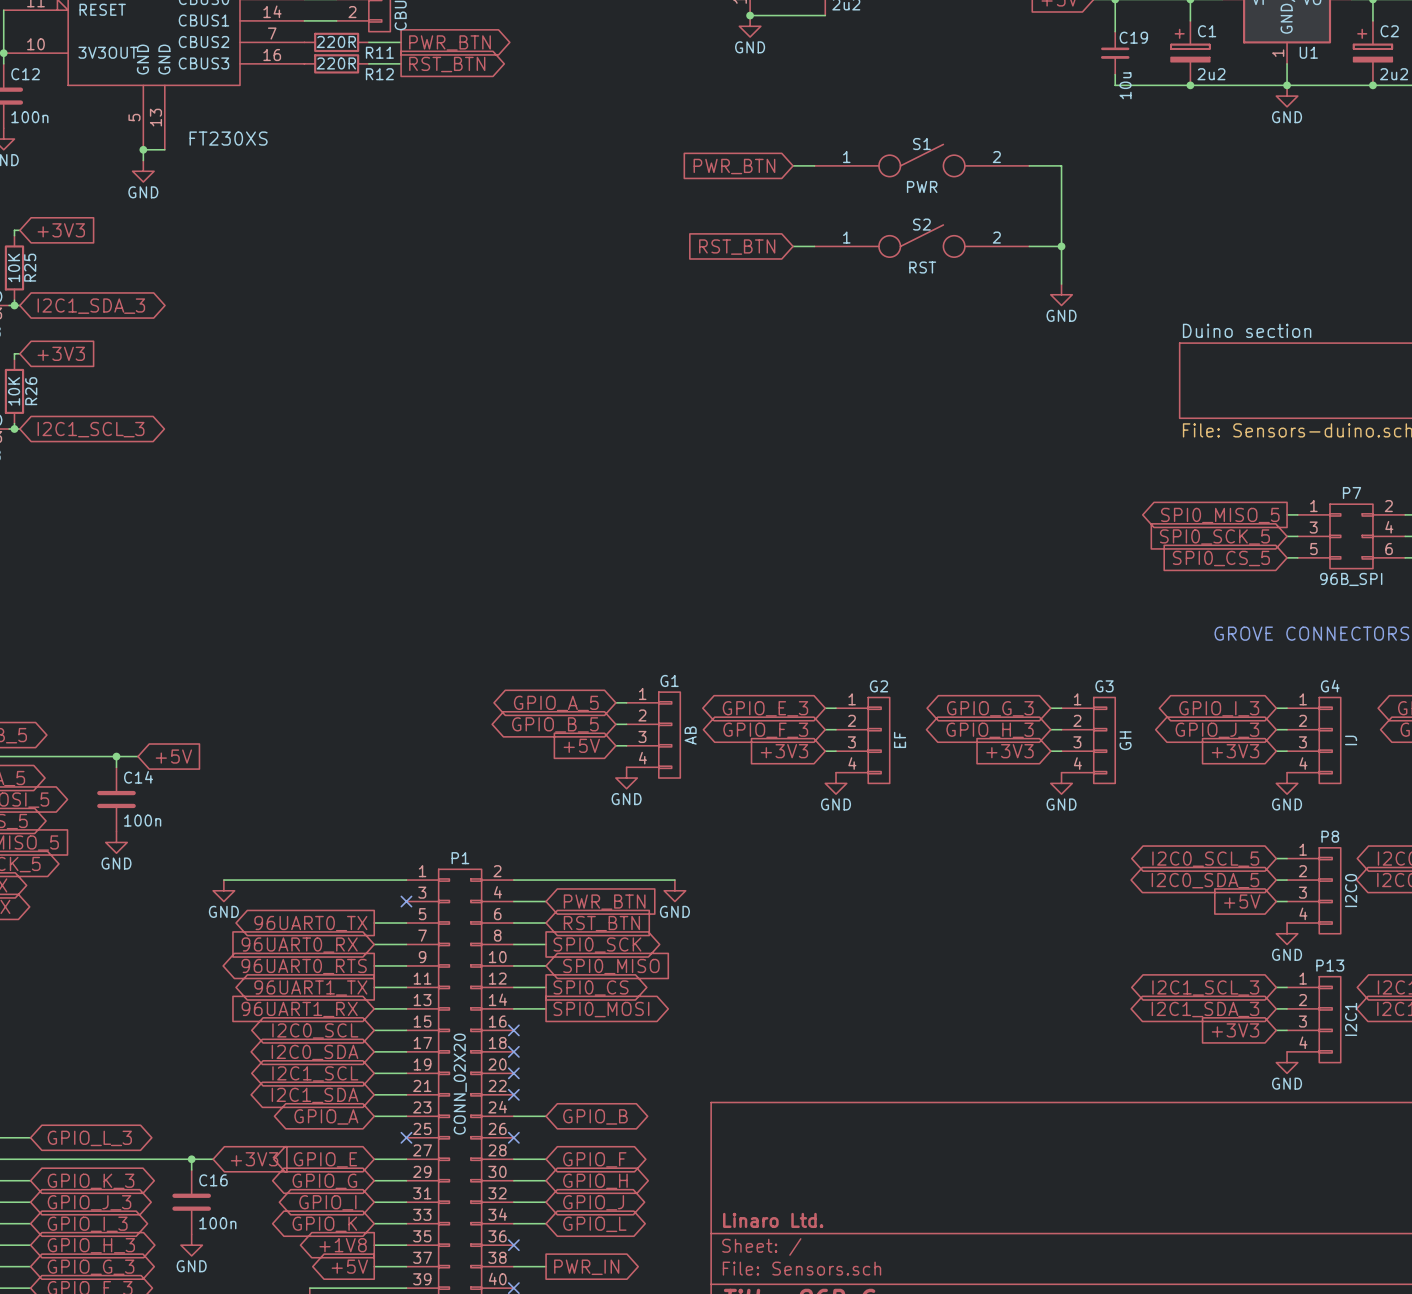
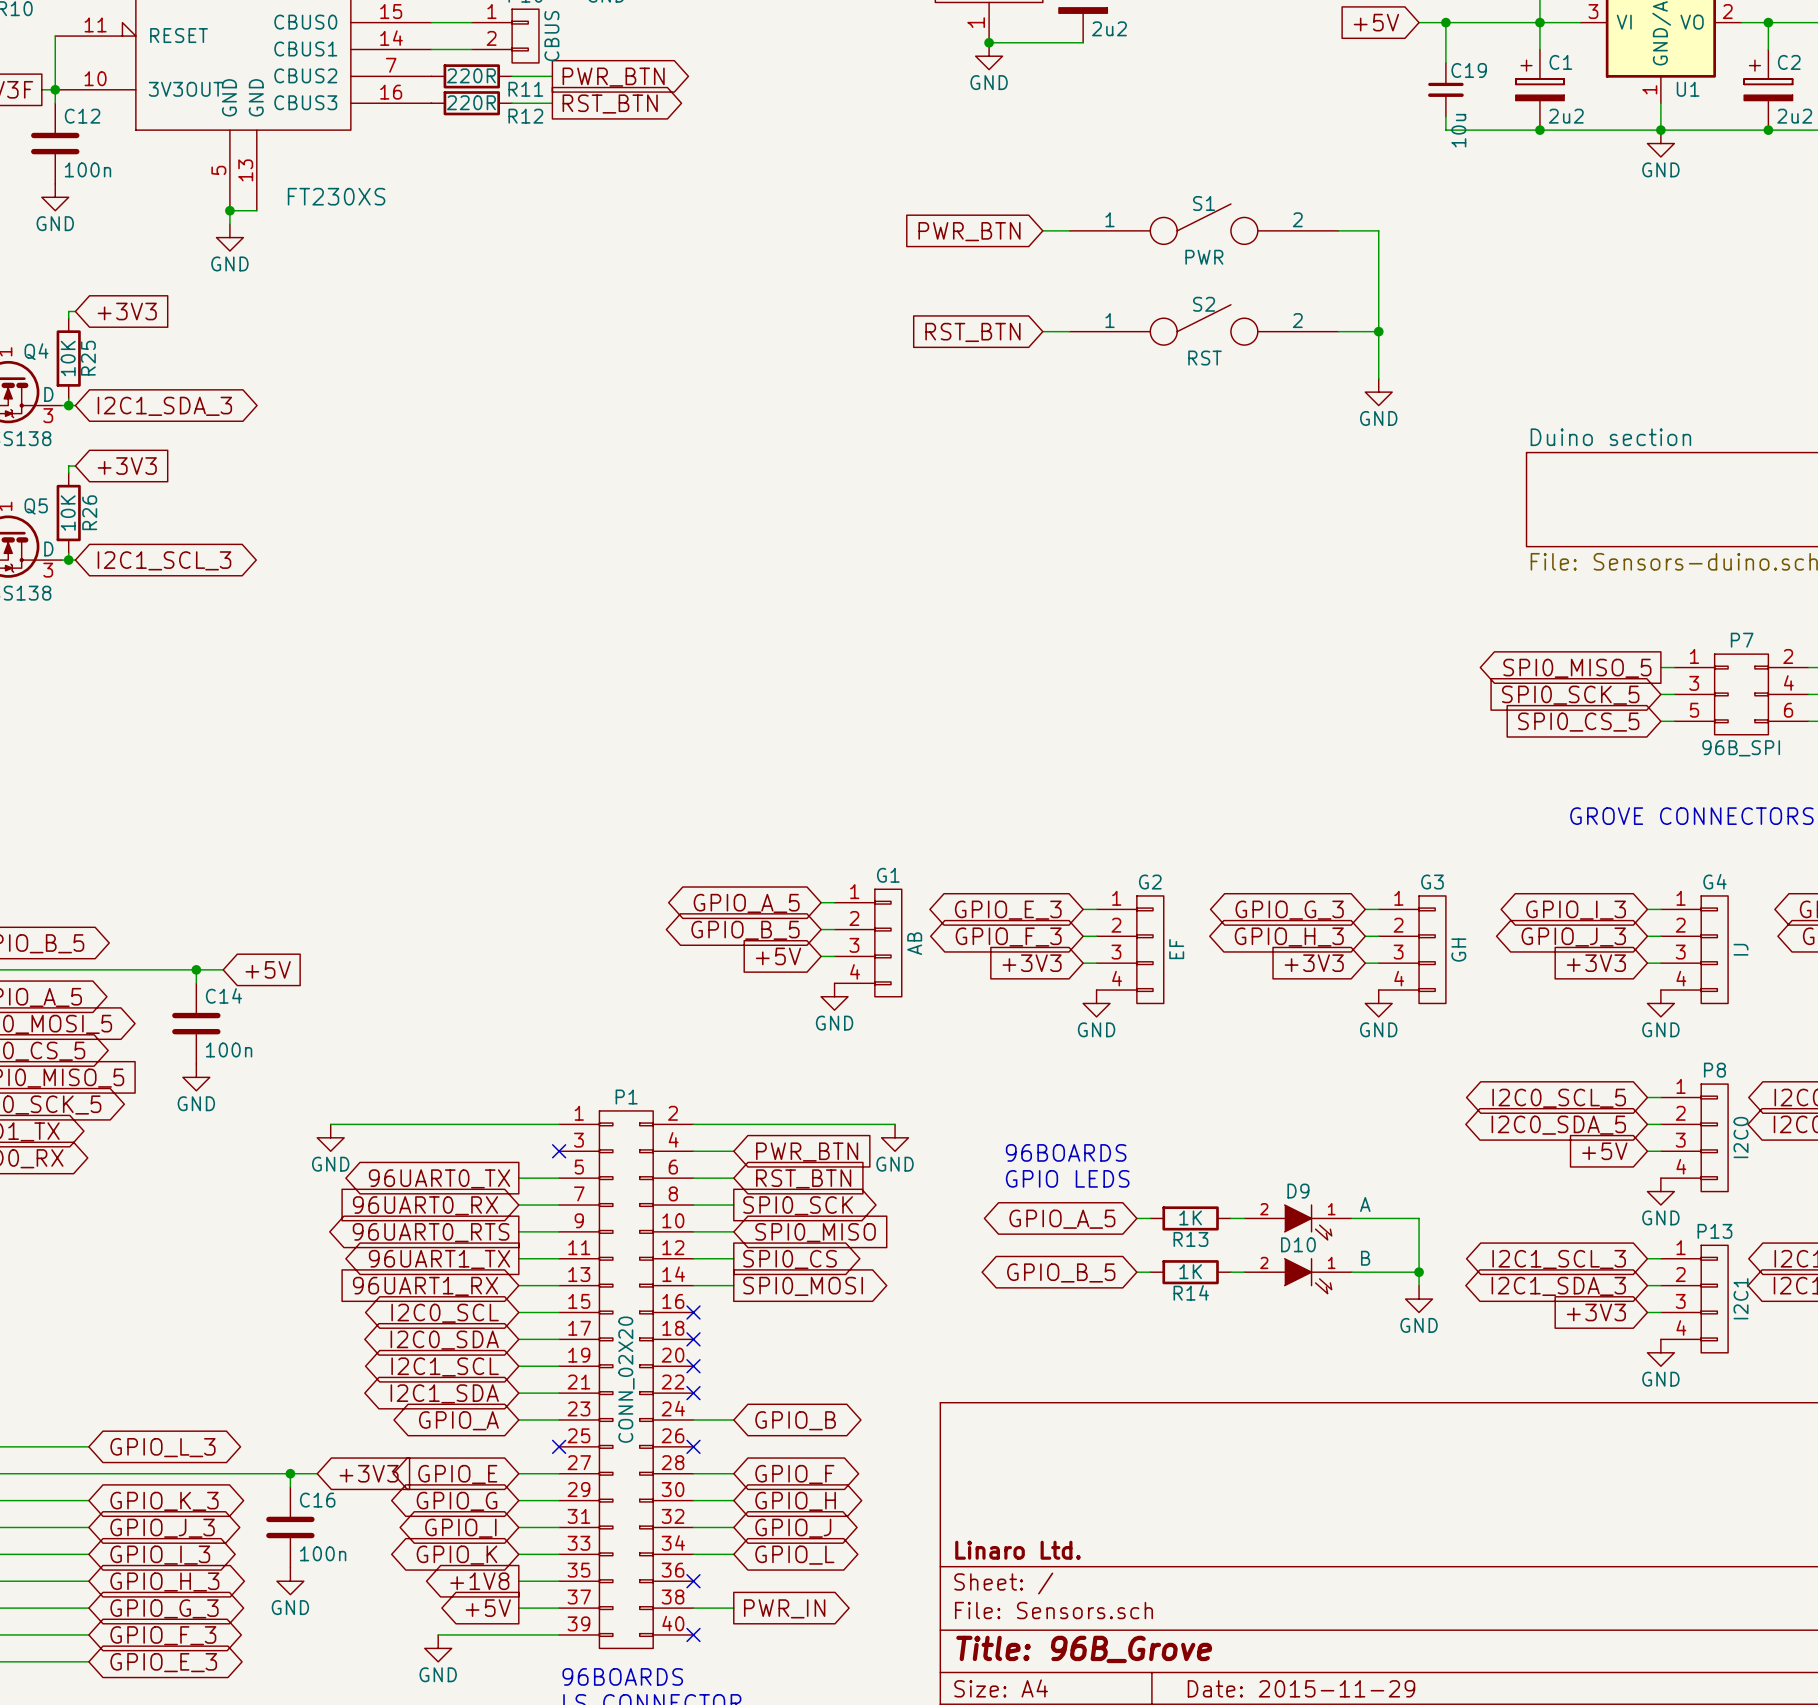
text: none -> 96BOARDS (1066, 1152)
text: none -> GPIO LEDS (1067, 1178)
global label: none -> GPIO_A_5 (1062, 1219)
wire: none -> (1136, 1218) (1150, 1218)
R13: none -> 1K (1190, 1218)
wire: none -> (1230, 1218) (1244, 1218)
wire: none -> (1351, 1218) (1419, 1218) (1419, 1285)
D9: none -> A (1298, 1222)
global label: none -> GPIO_B_5 (1061, 1272)
wire: none -> (1136, 1272) (1150, 1272)
R14: none -> 1K (1190, 1272)
wire: none -> (1230, 1272) (1244, 1272)
wire: none -> (1351, 1272) (1419, 1272)
junction: none -> (1419, 1272)
D10: none -> B (1298, 1276)
power symbol: none -> GND (1419, 1299)

